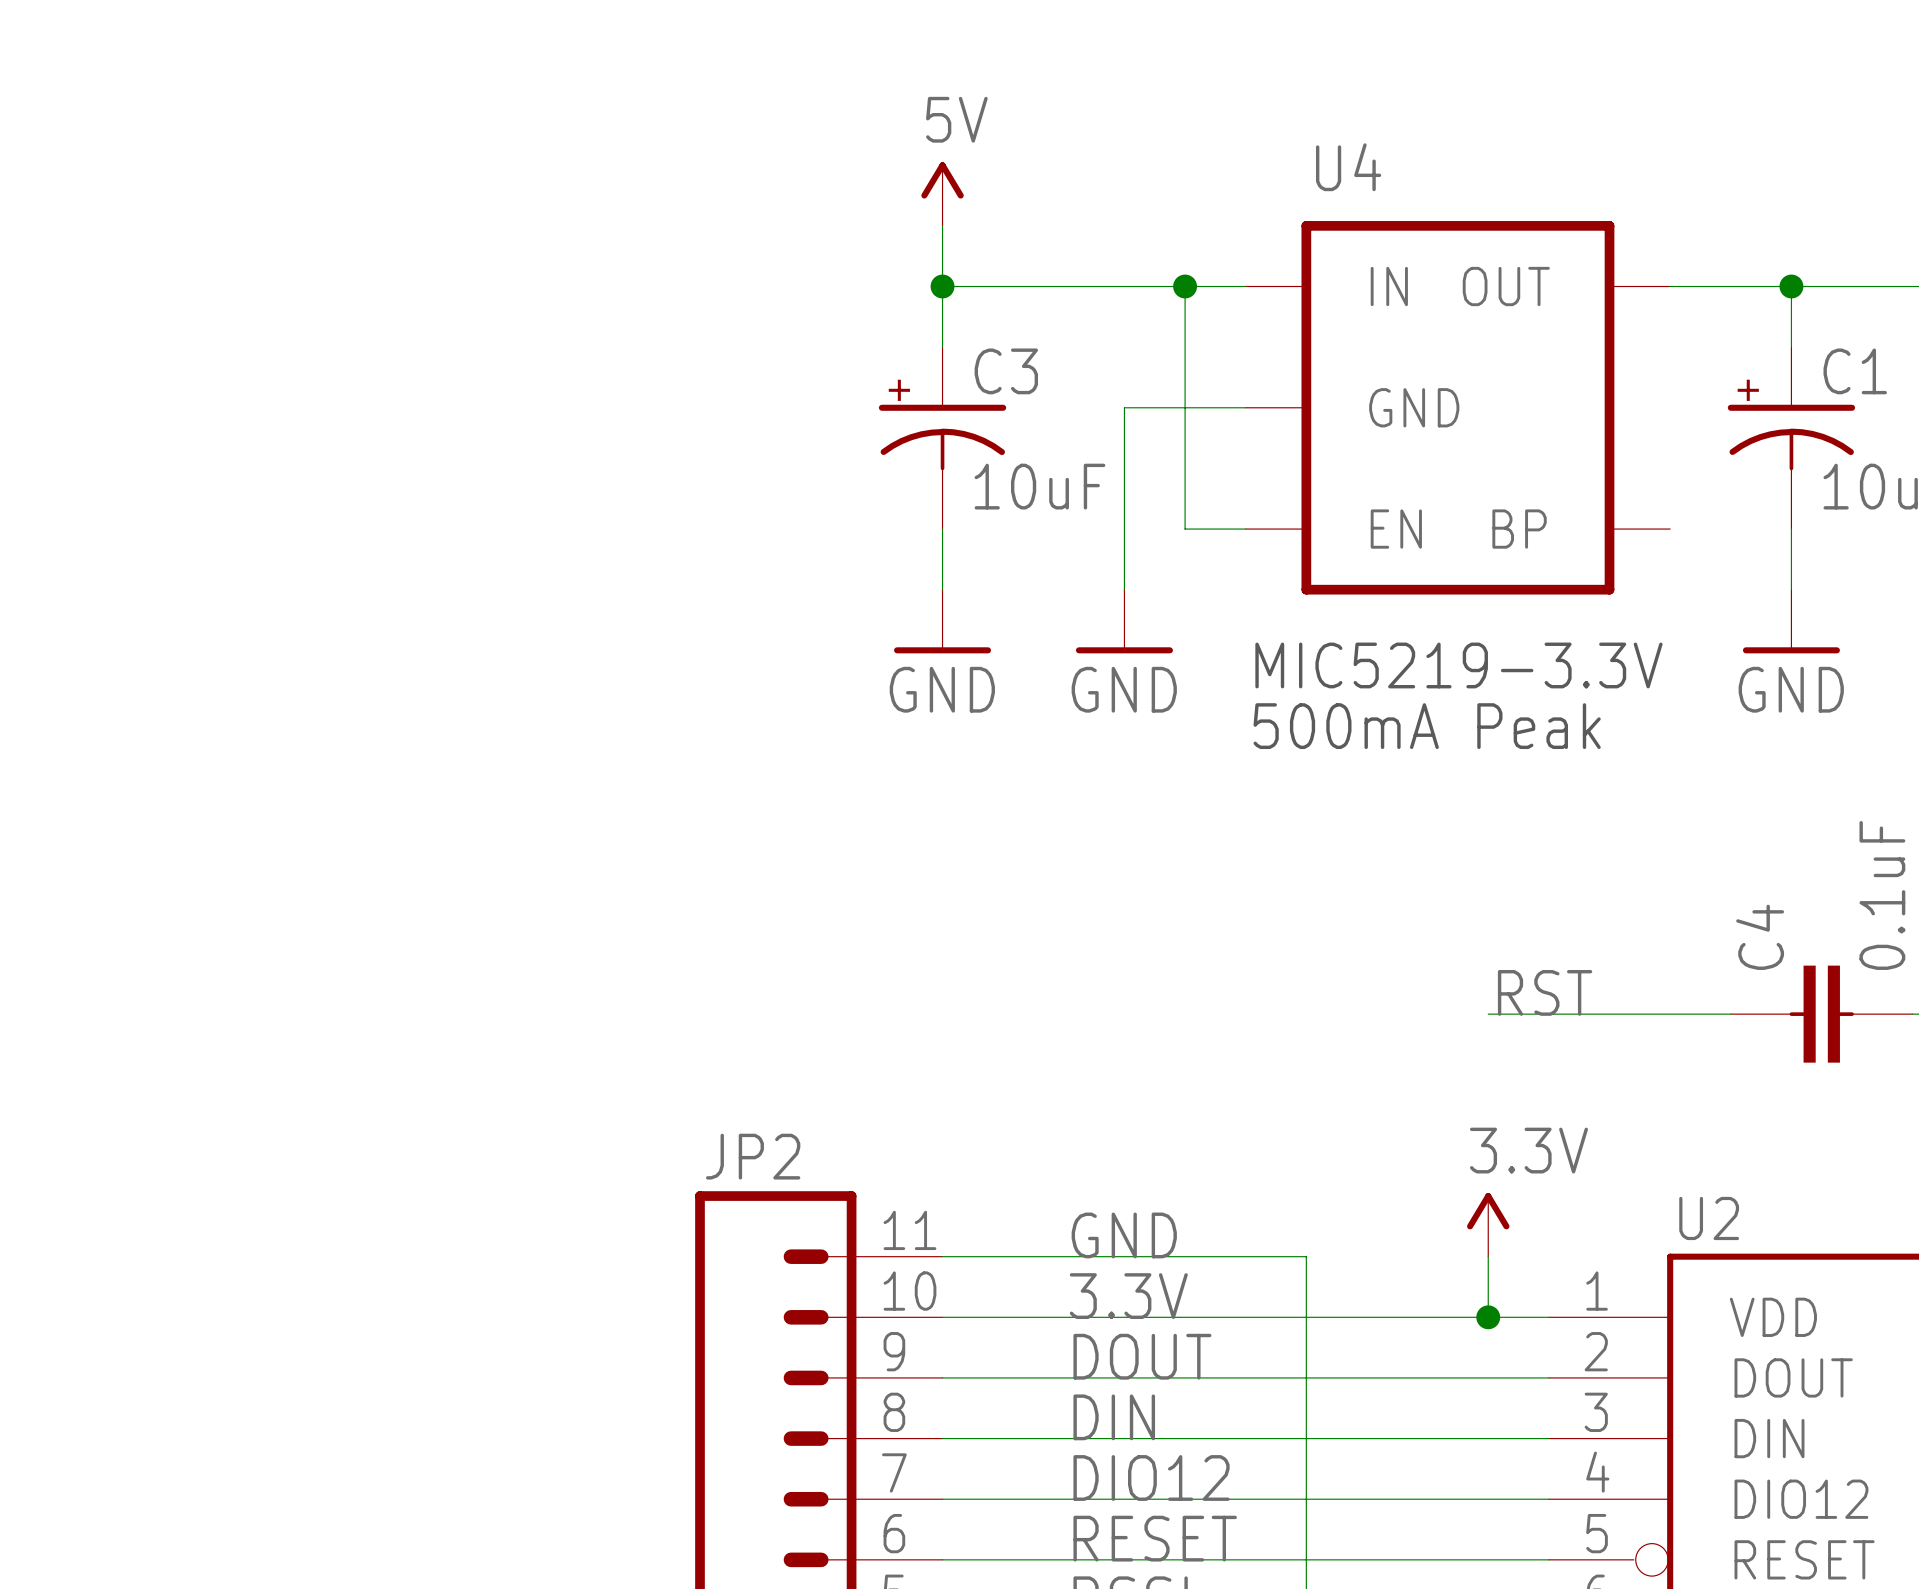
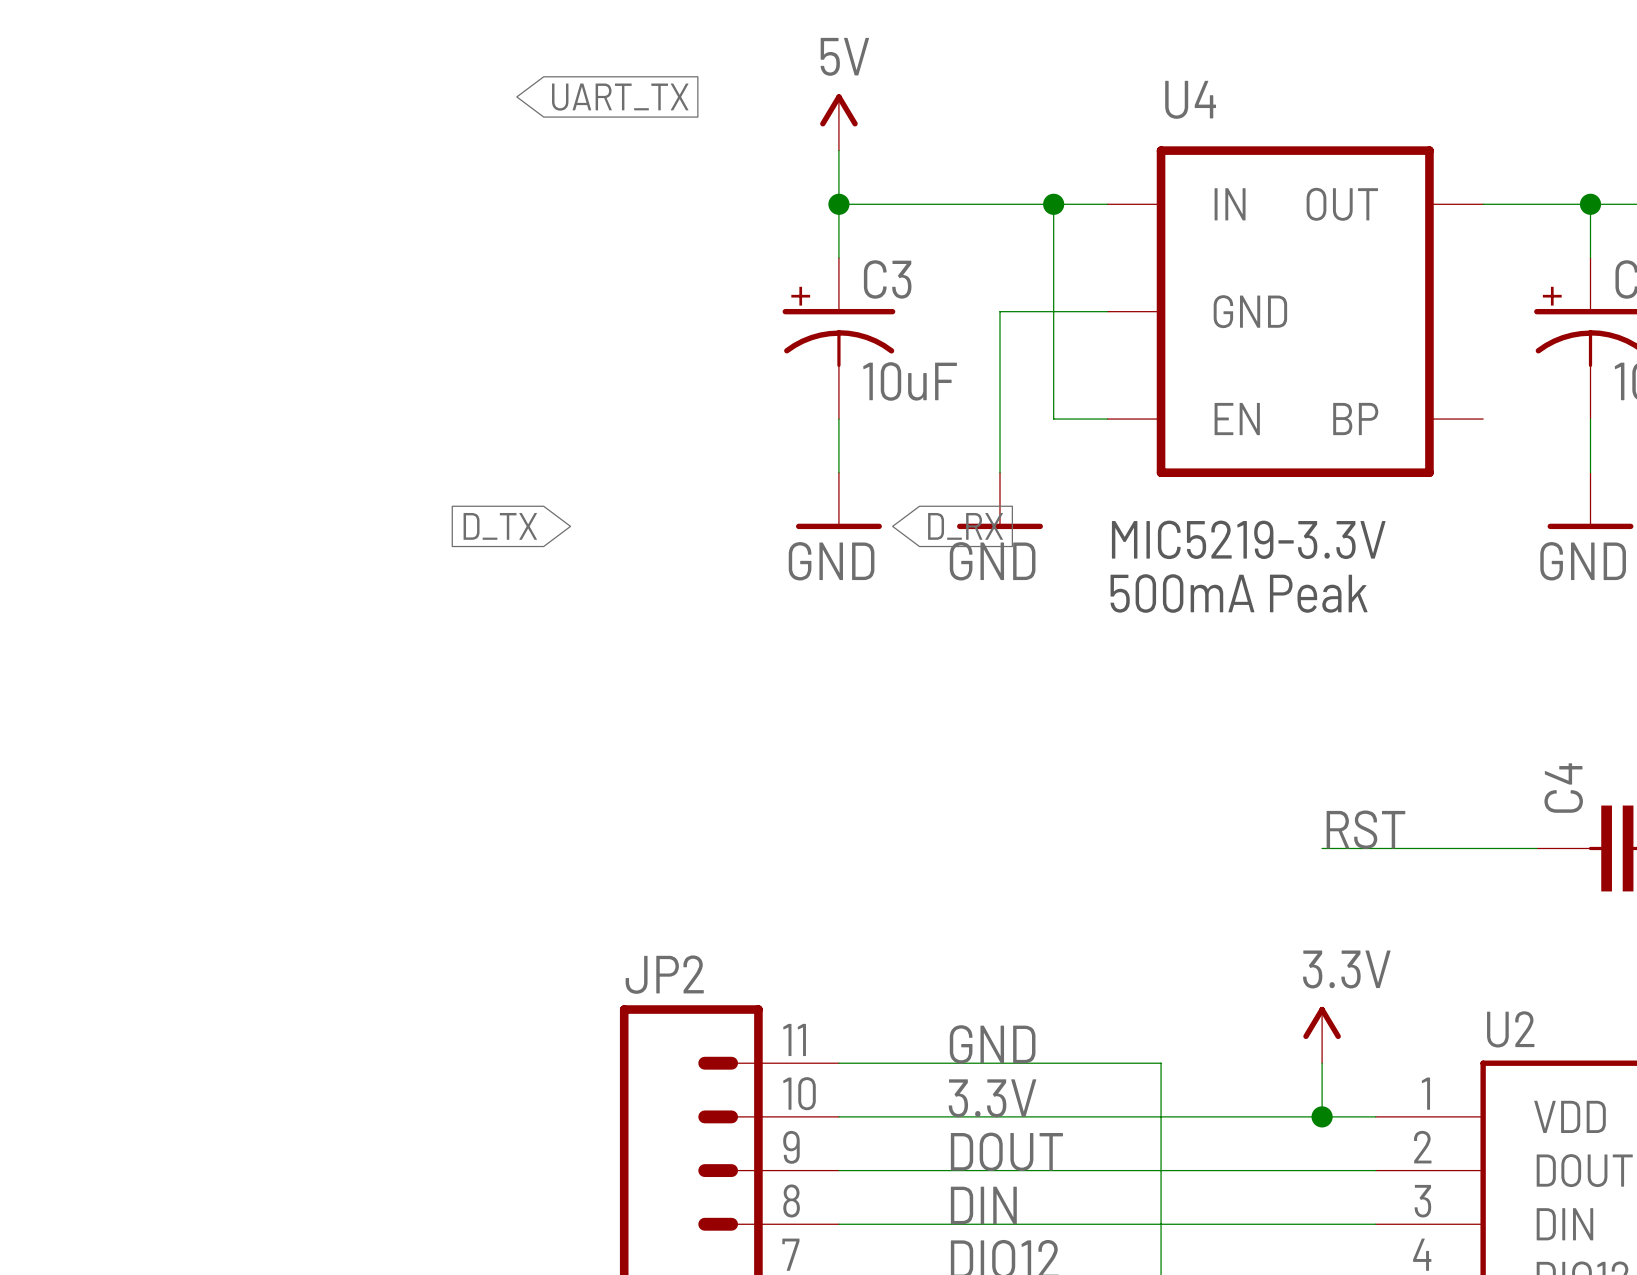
global label: none -> UART_TX (620, 97)
global label: none -> D_TX (500, 526)
global label: none -> D_RX (965, 526)

